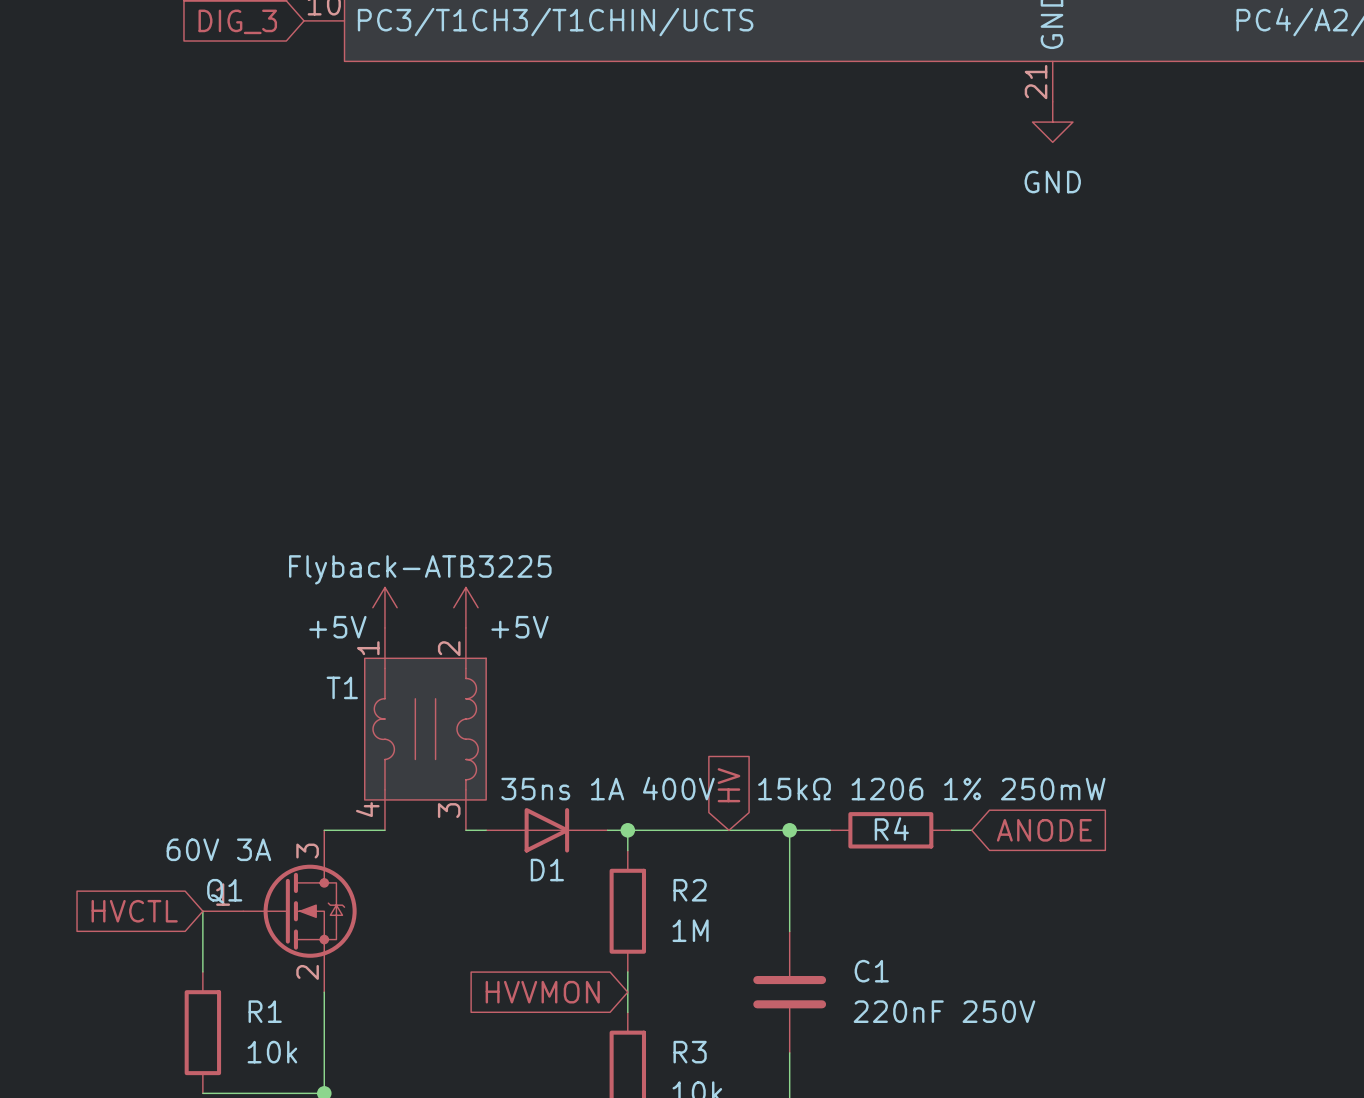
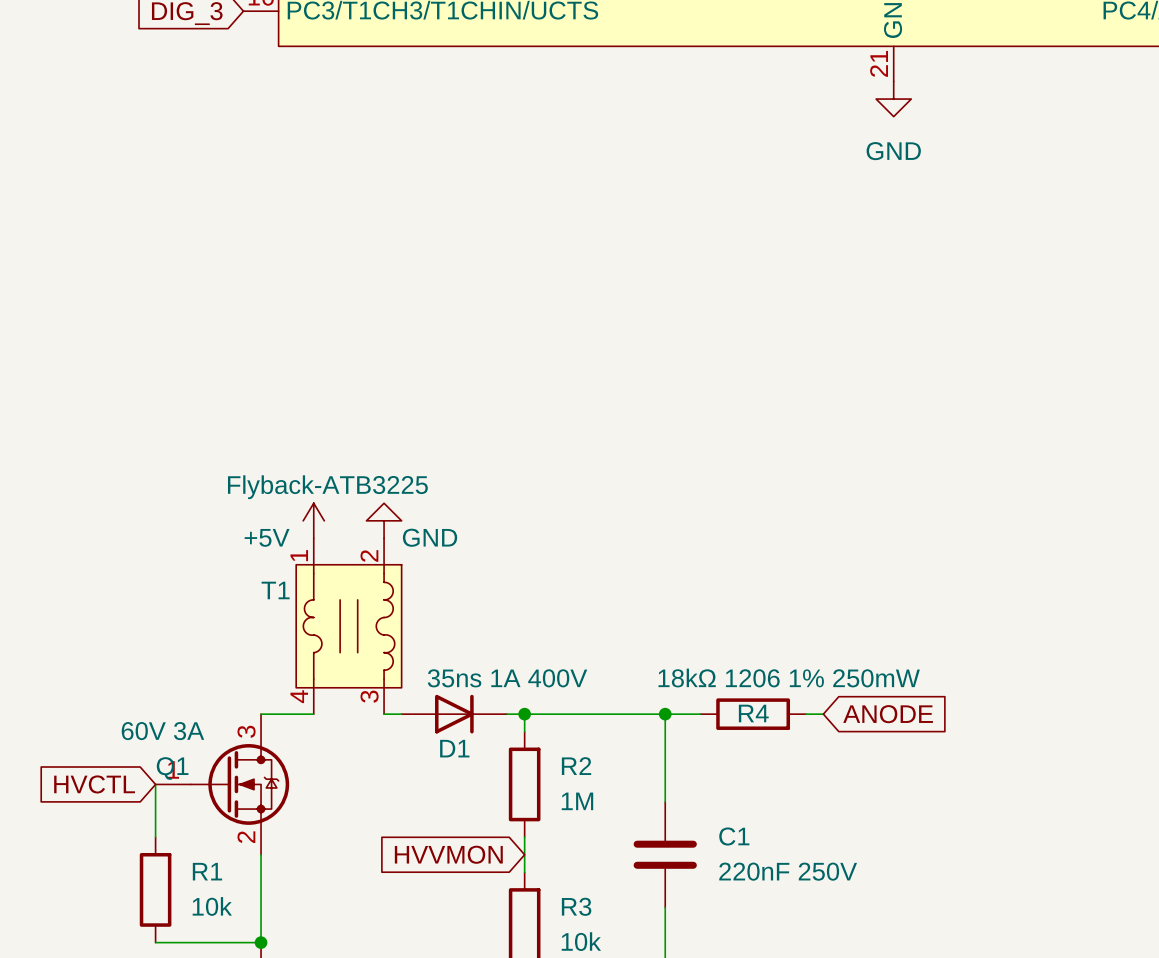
power symbol: +5V (465, 607) -> GND (384, 520)
global label: HV (728, 785) -> none
R4 value: 15kΩ 1206 1% 250mW (931, 789) -> 18kΩ 1206 1% 250mW (789, 678)

